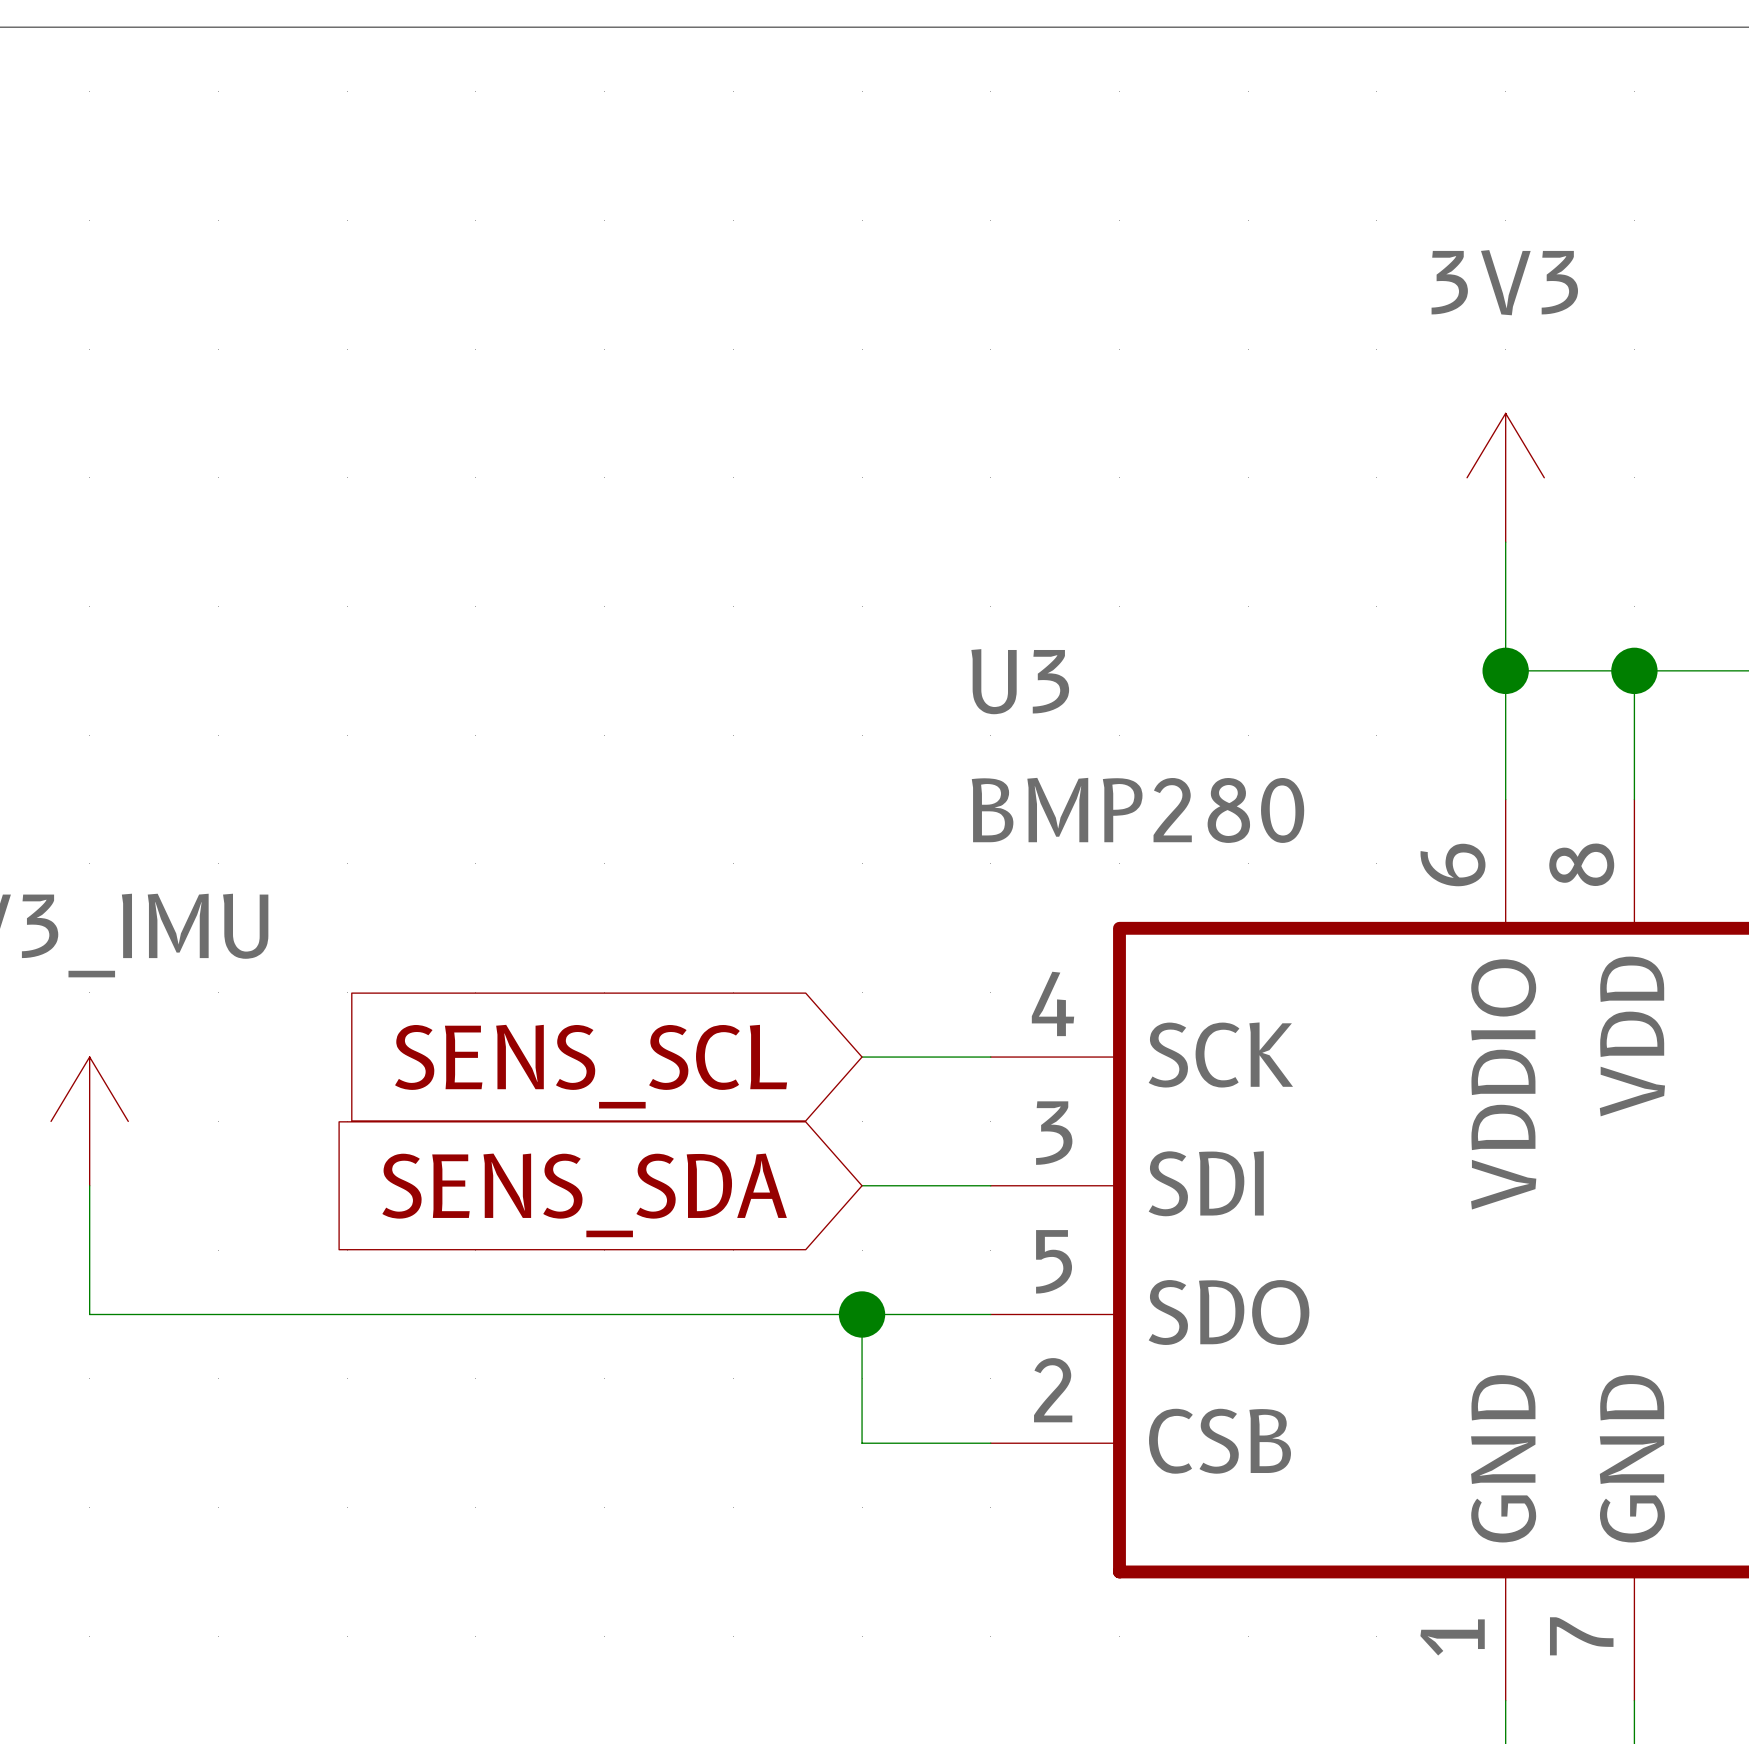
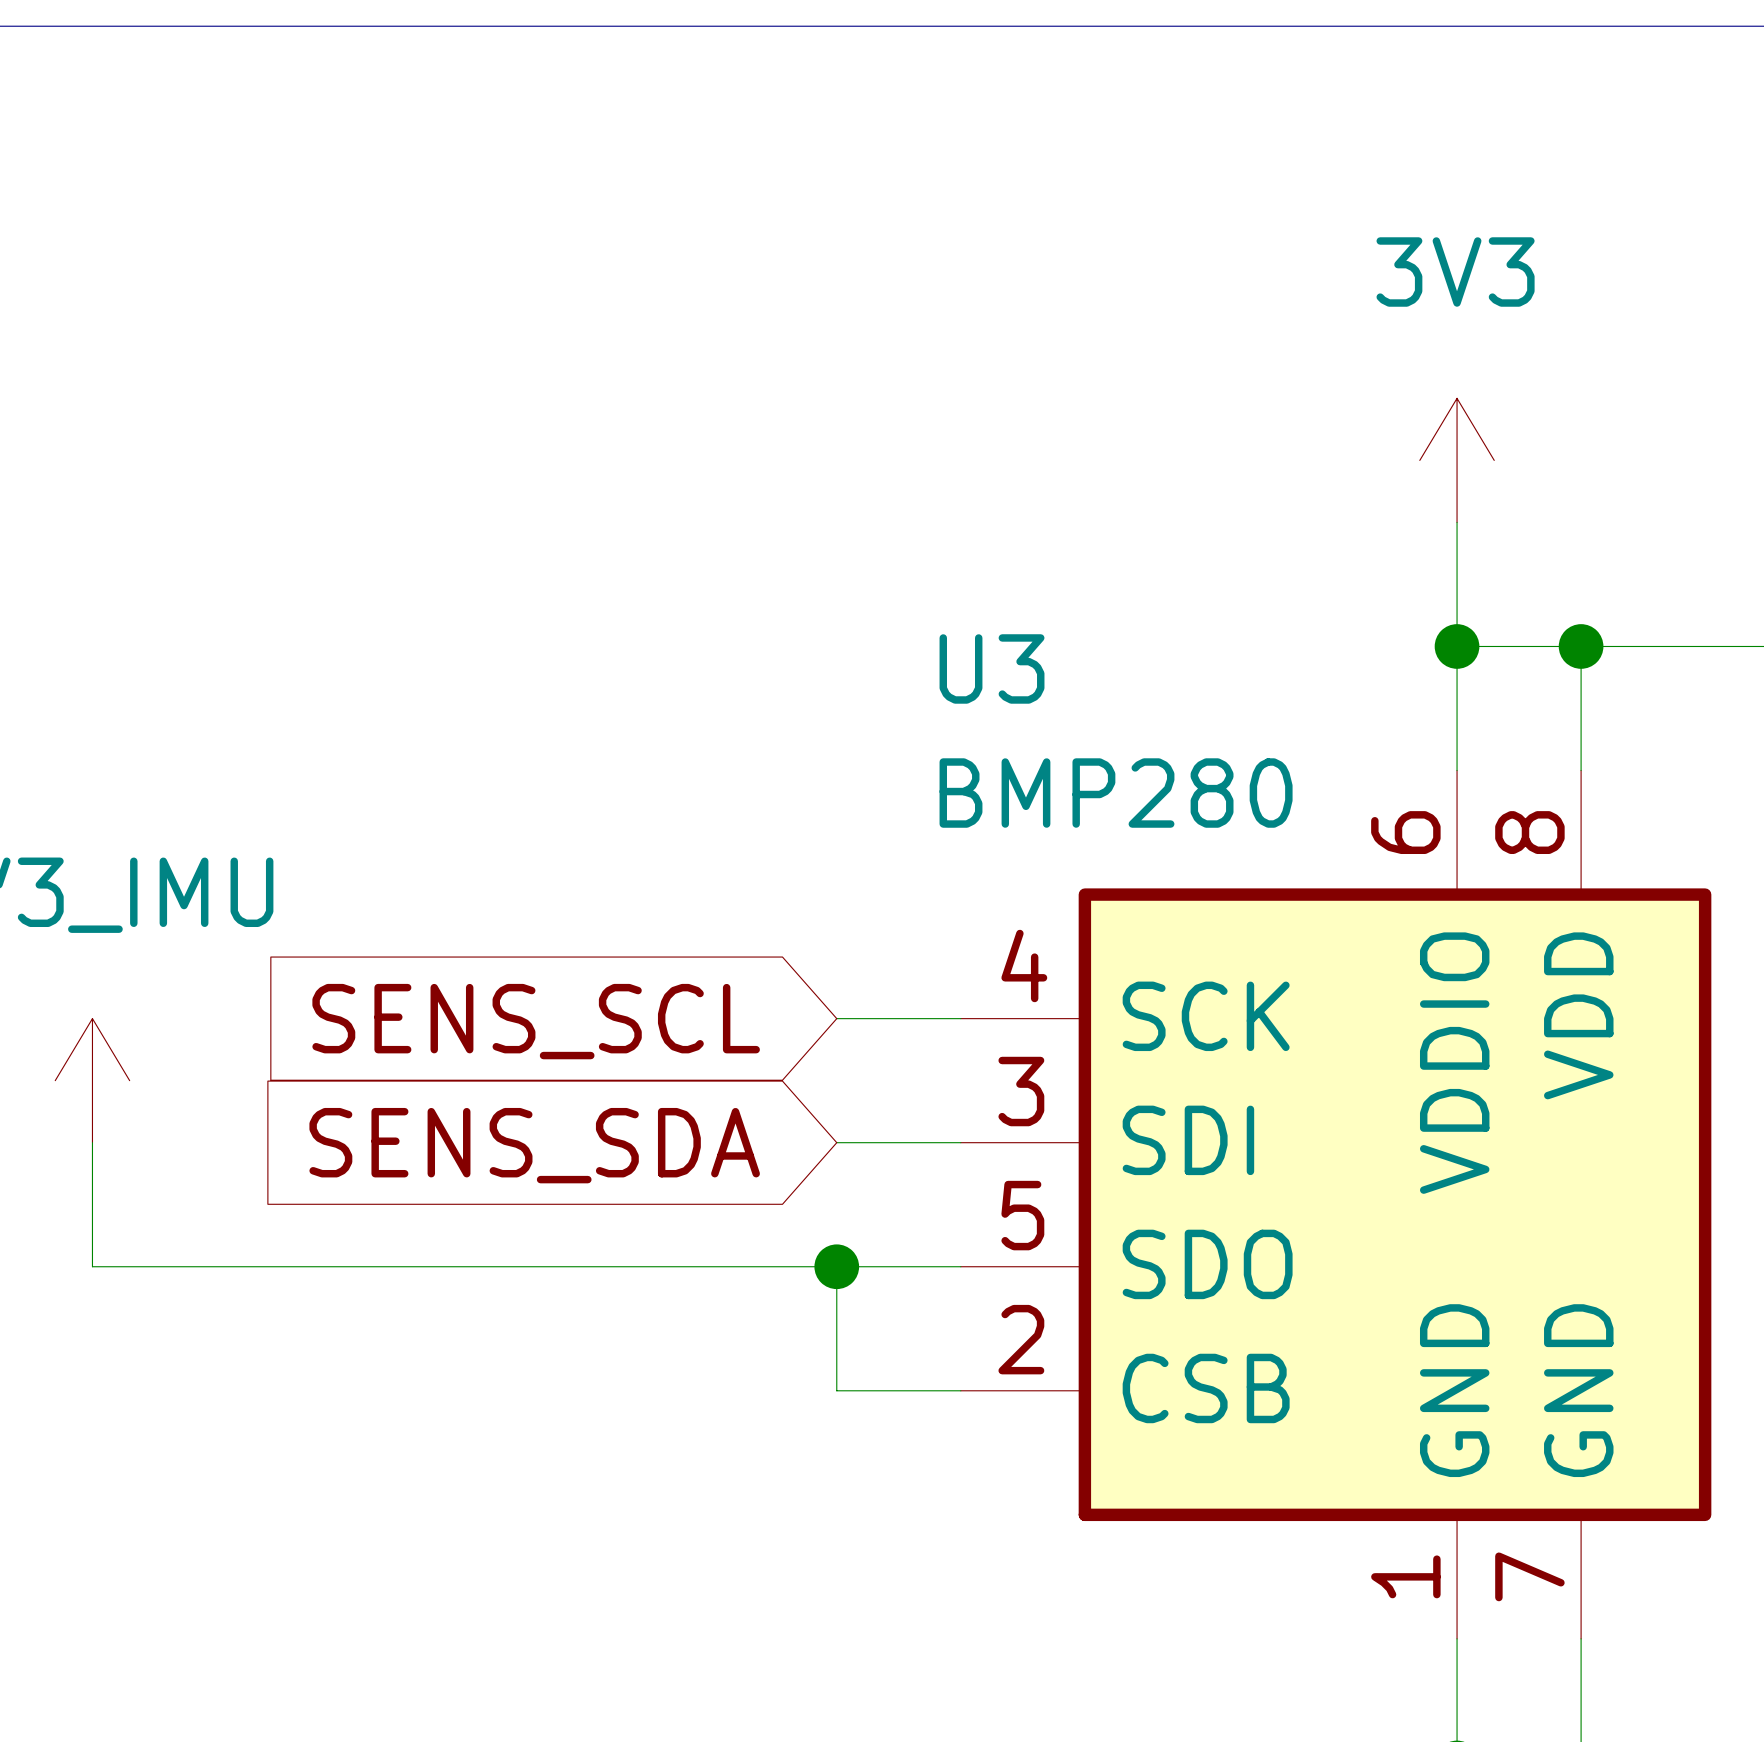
U3 name position: U3 (1020, 681) -> U3 (992, 668)
U3 value position: BMP280 (1137, 810) -> BMP280 (1116, 793)

